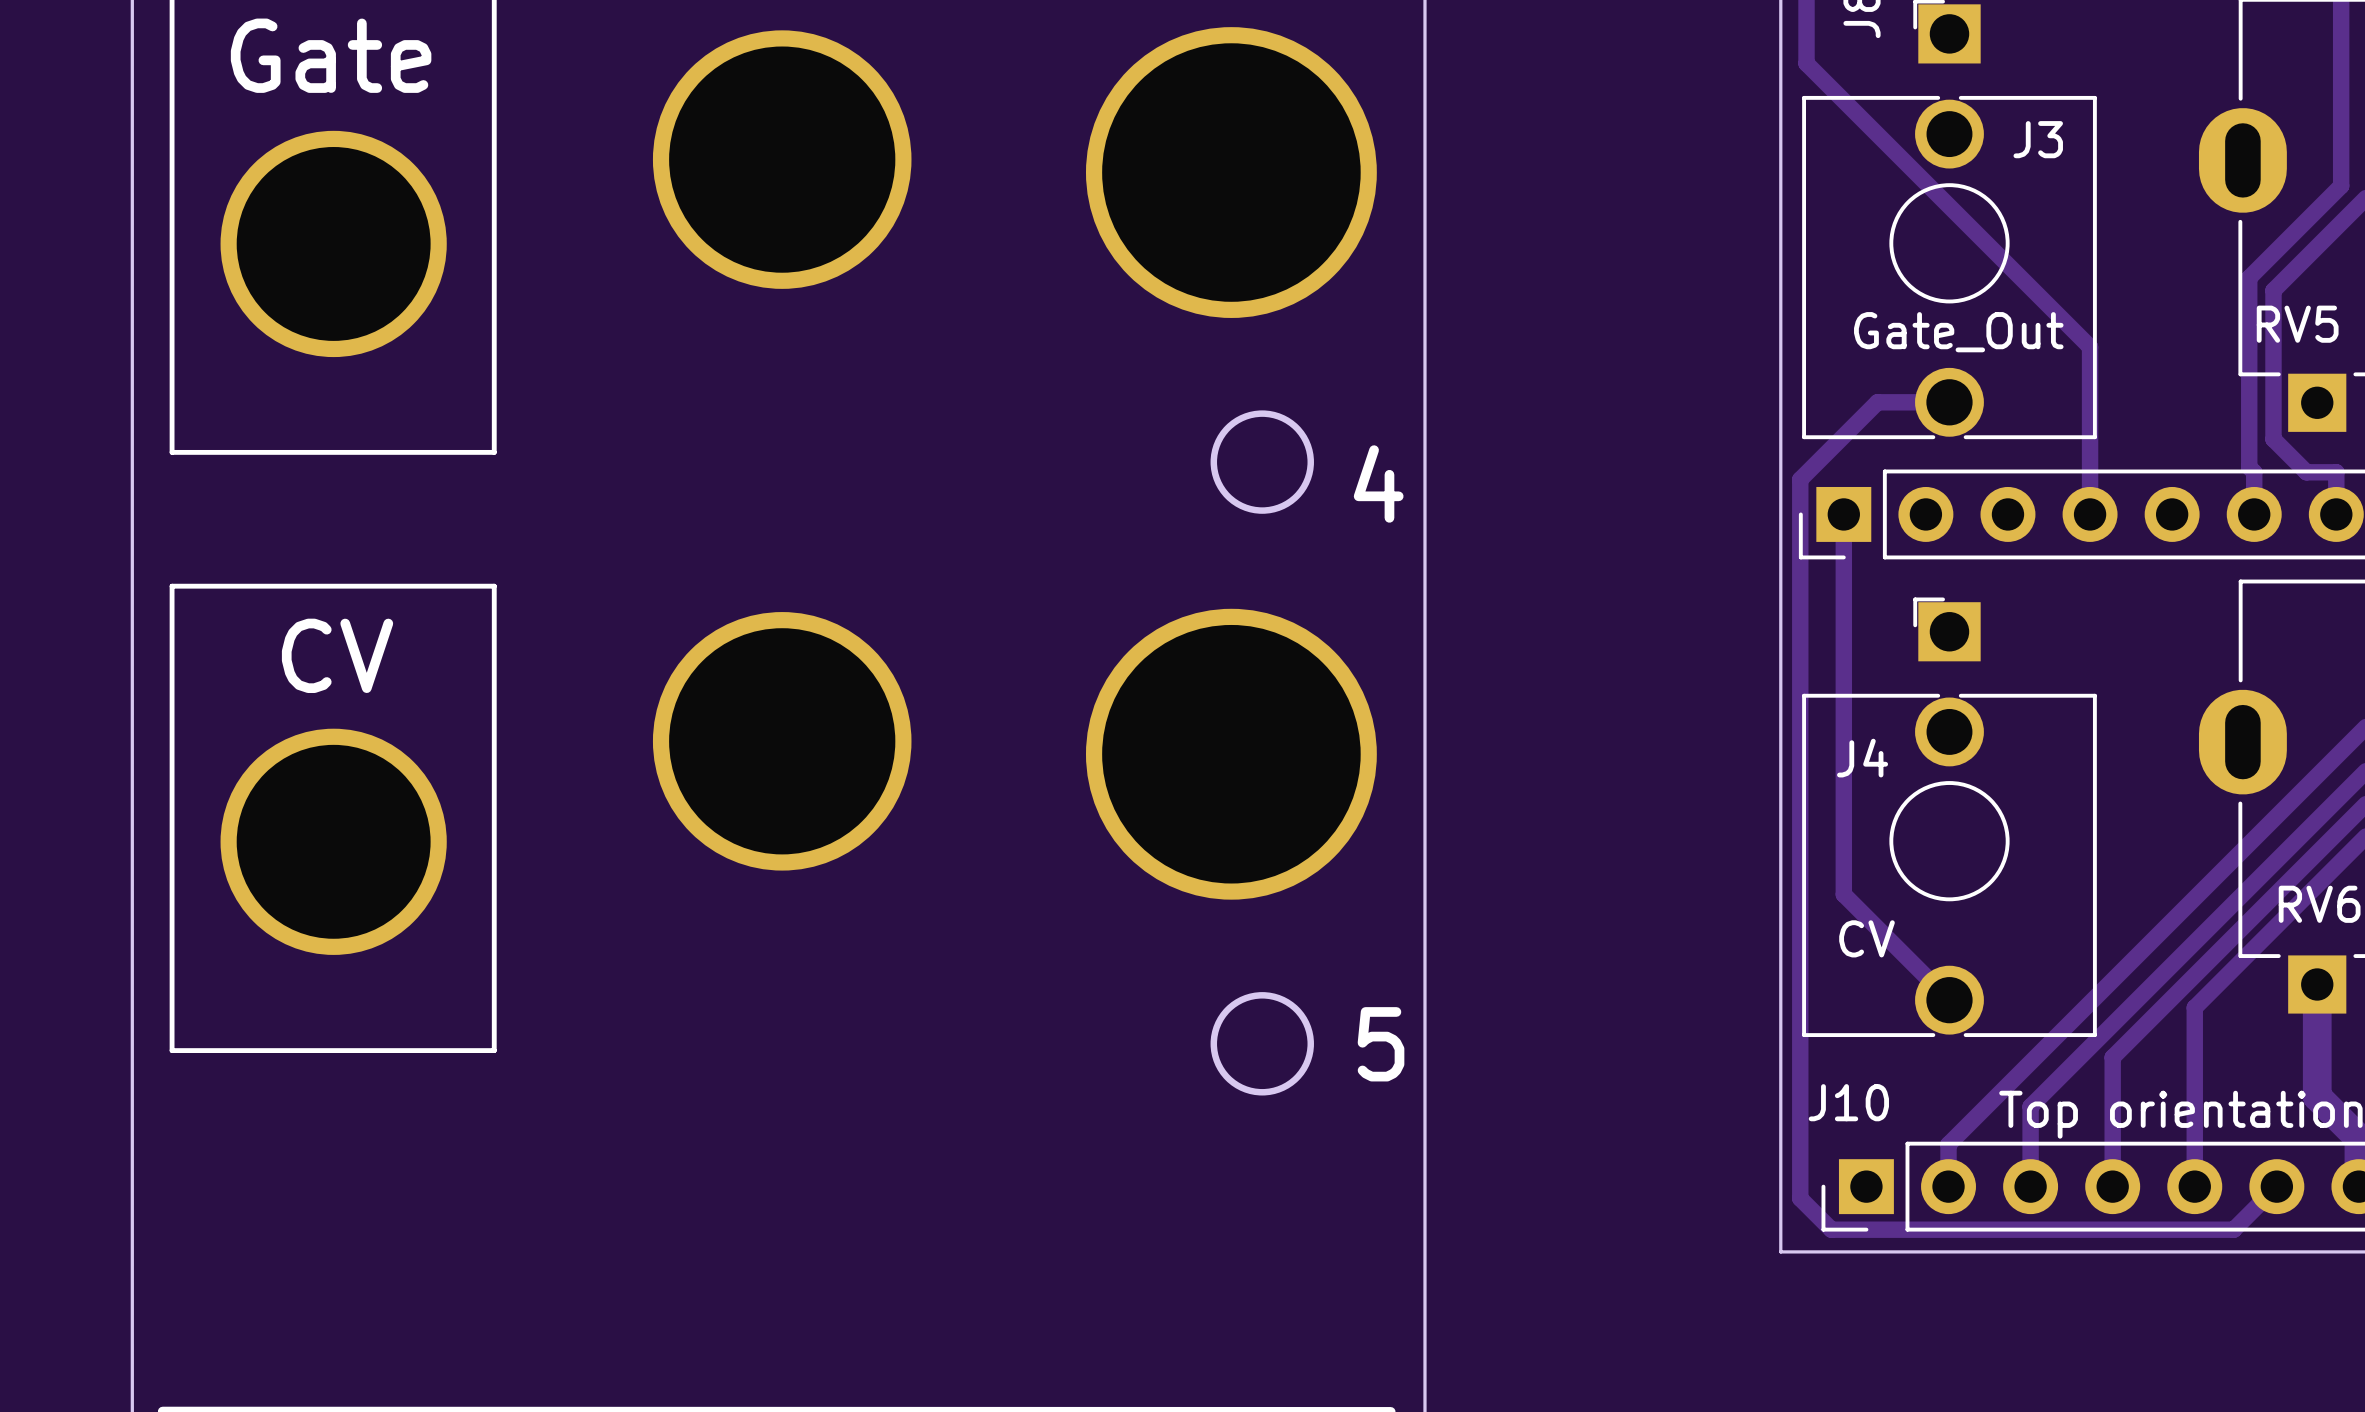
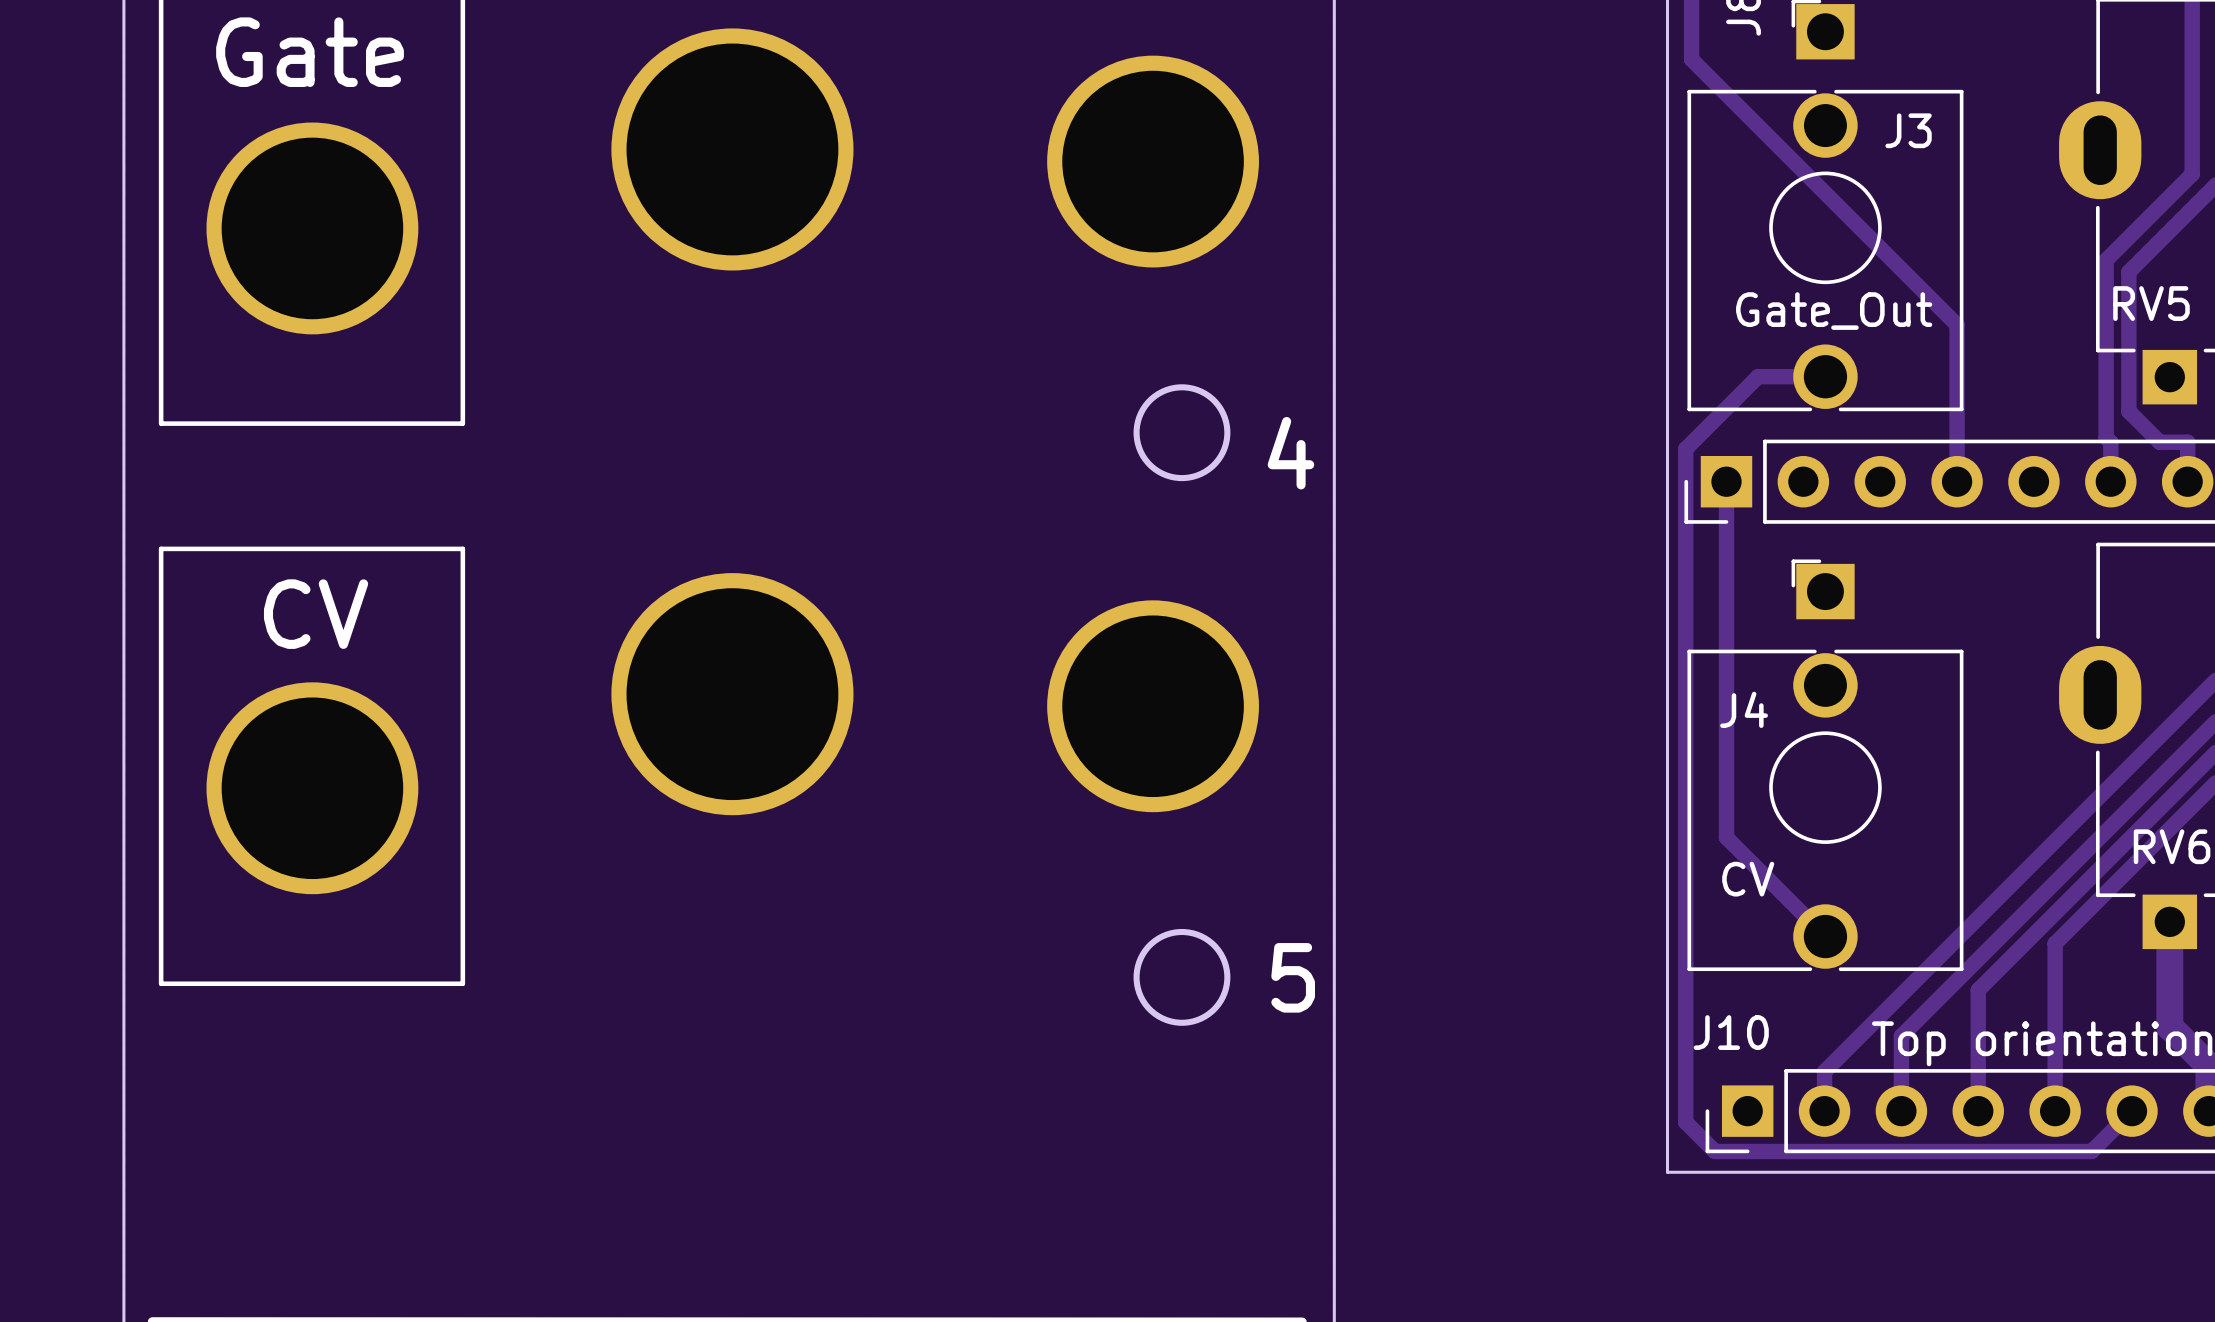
part footprint: [1085, 27, 1377, 318] -> [1047, 55, 1259, 268]
part footprint: [1085, 608, 1377, 900] -> [1047, 600, 1259, 813]

